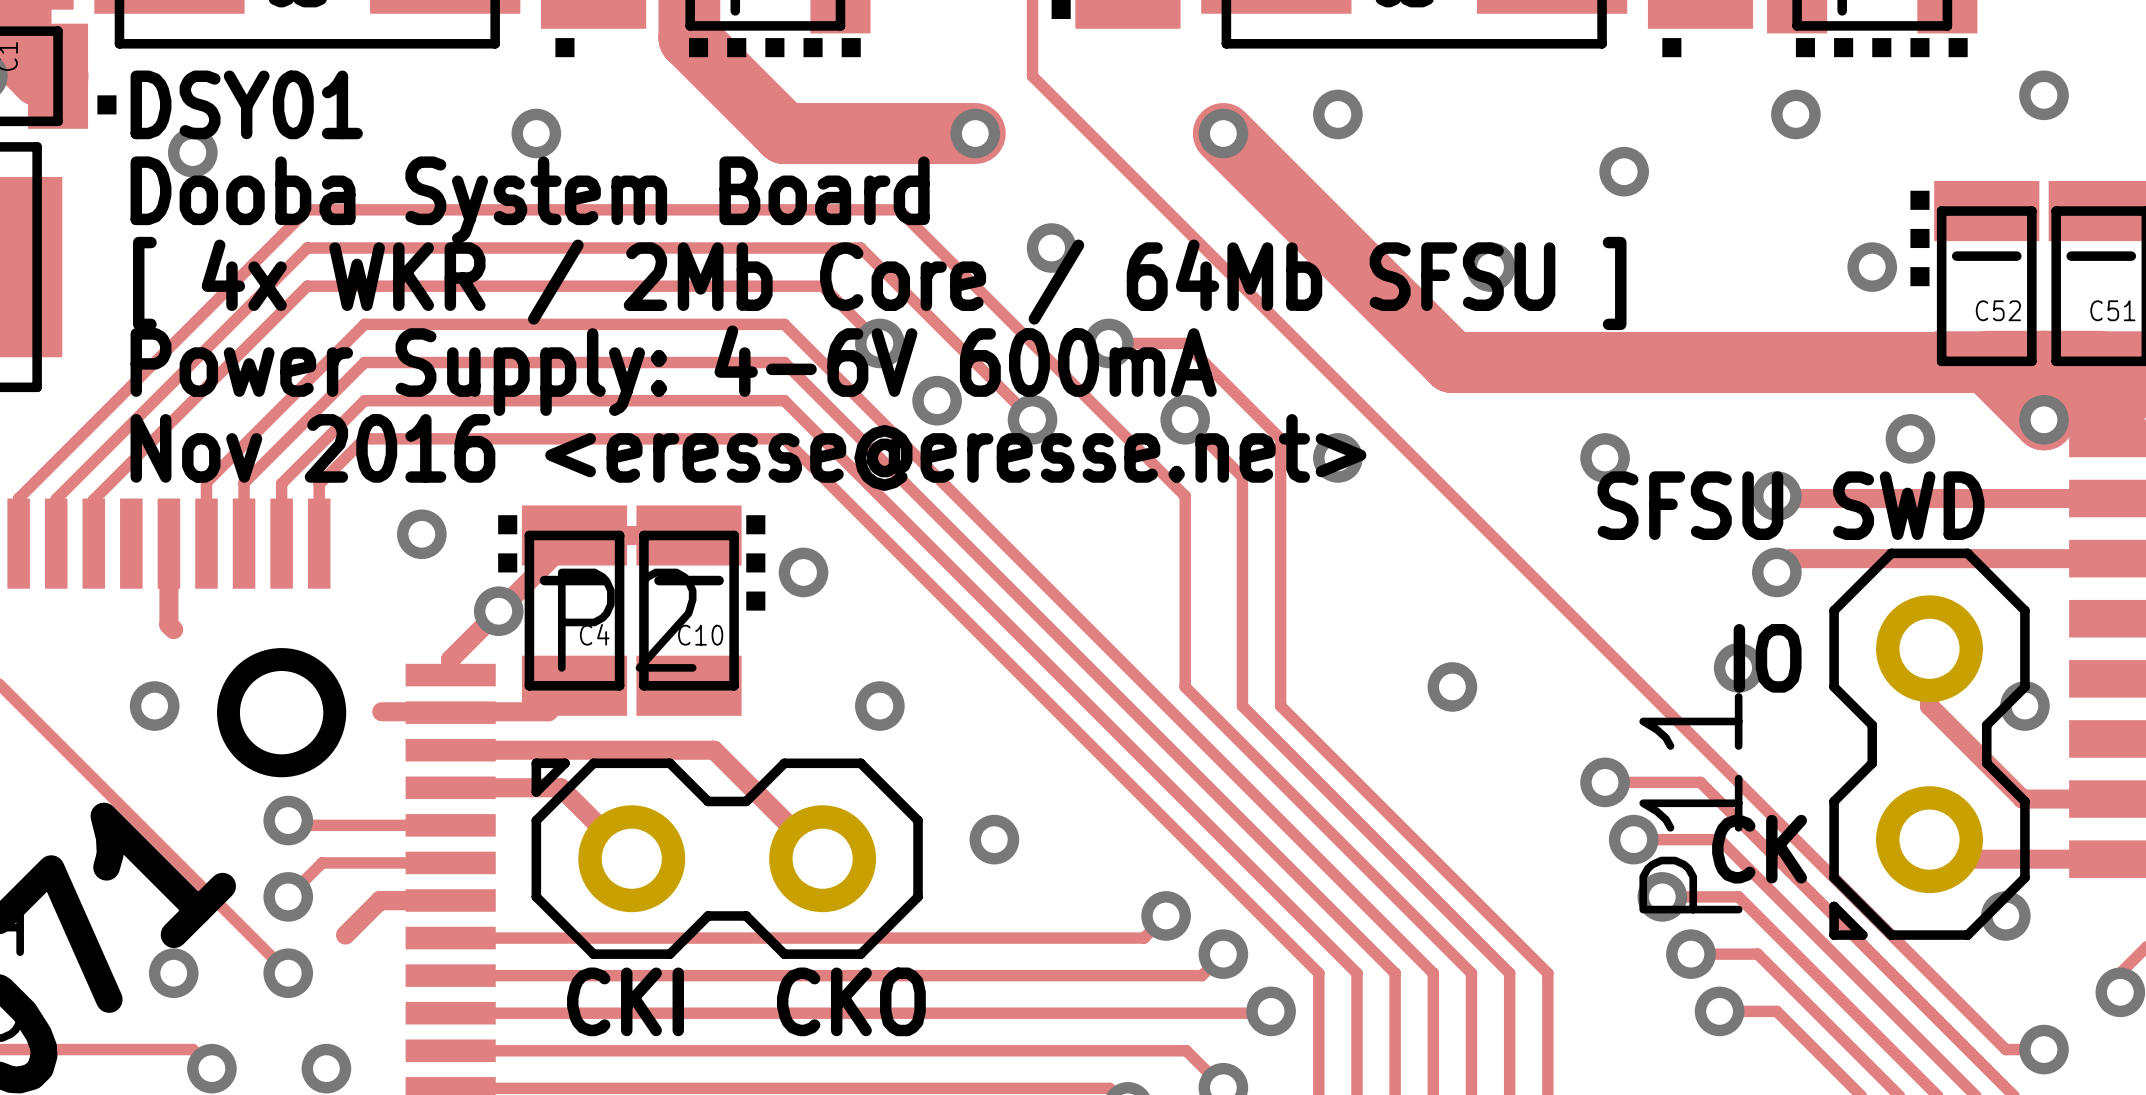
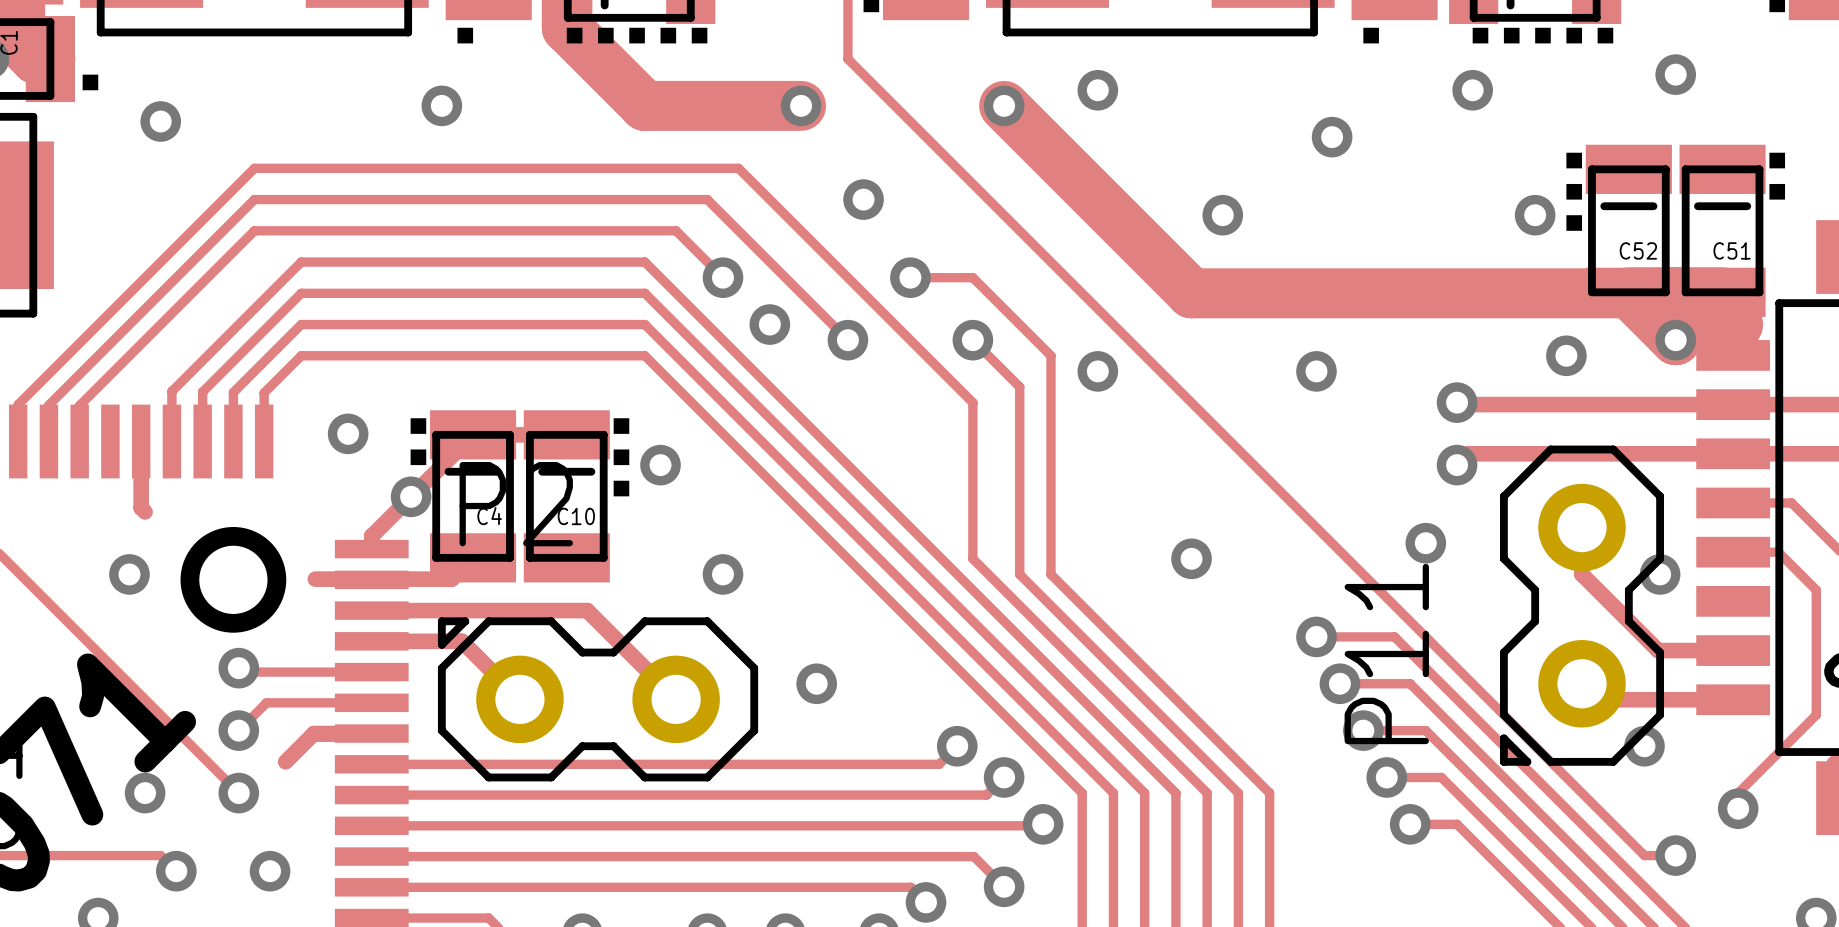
text: DSY01 (246, 104) -> none
text: Dooba System Board (530, 200) -> none
text: [ 4x WKR / 2Mb Core / 64Mb SFSU ] (879, 283) -> none
text: Power Supply: 4-6V 600mA (673, 370) -> none
text: Nov 2016 <eresse@eresse.net> (748, 452) -> none
text: SFSU SWD (1791, 505) -> none
text: IO (1767, 658) -> none
text: CK (1759, 849) -> none
text: CKI (625, 1001) -> none
text: CKO (851, 1001) -> none

